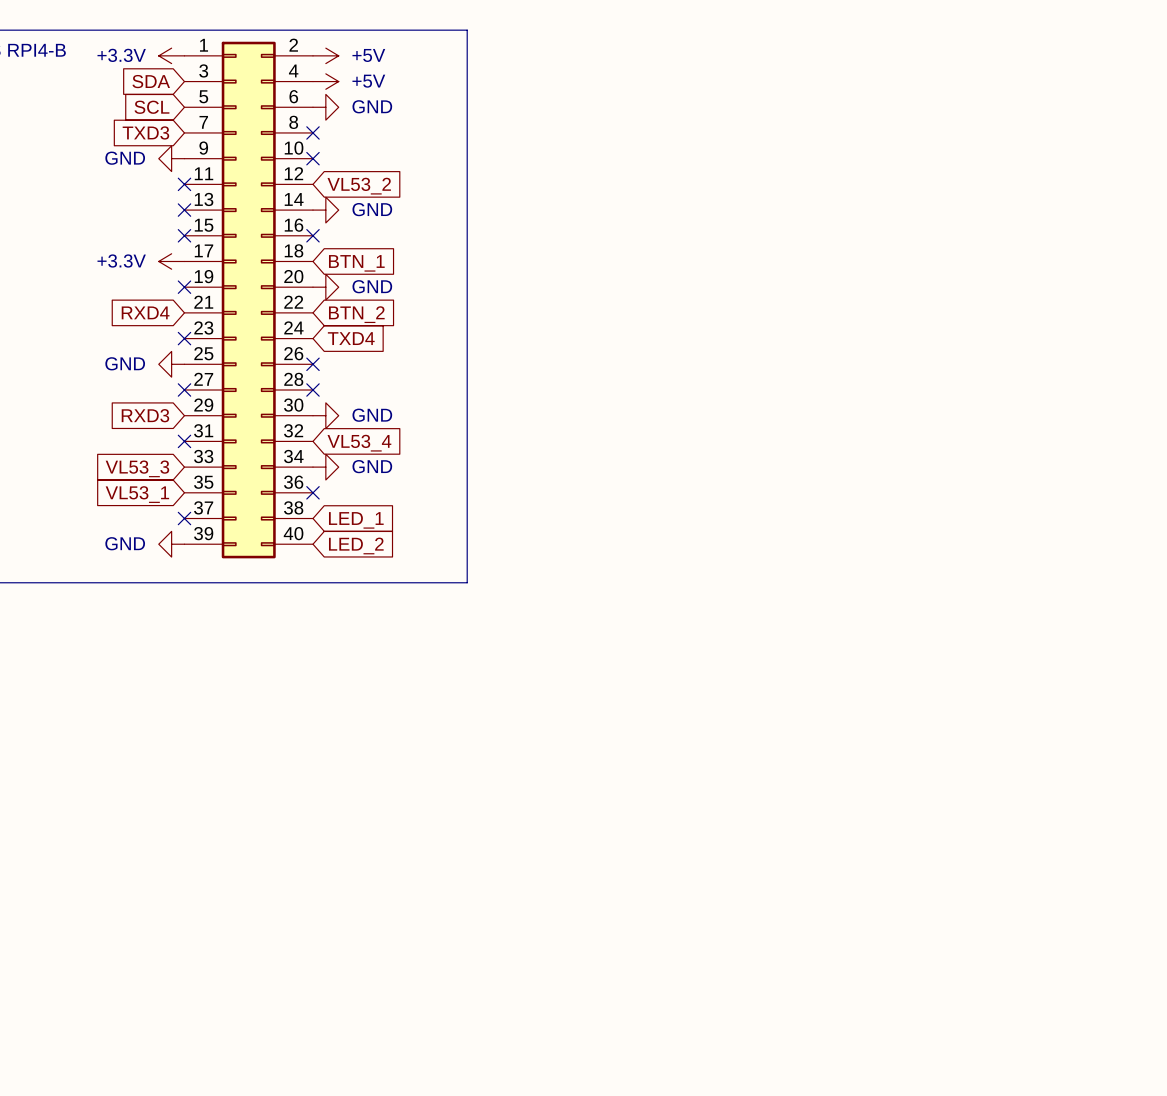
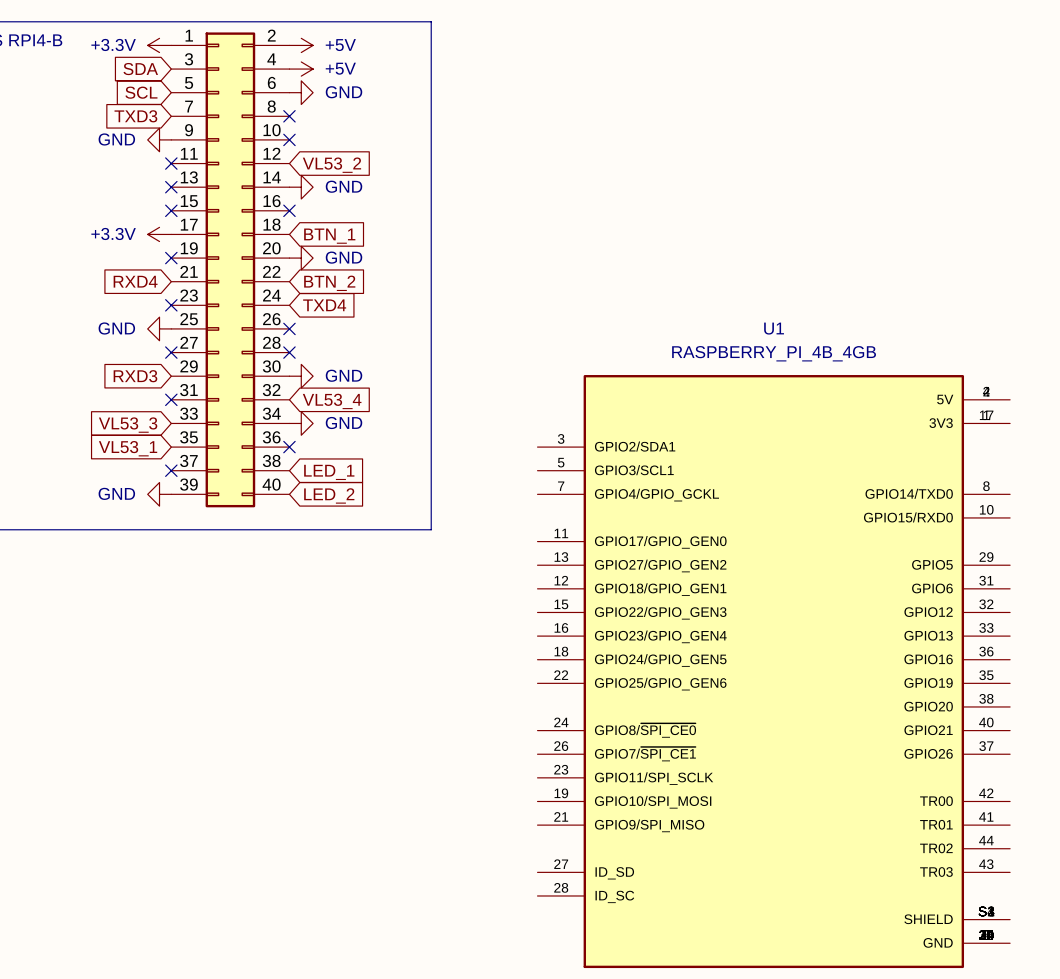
U1: none -> RASPBERRY_PI_4B_4GB (773, 671)

